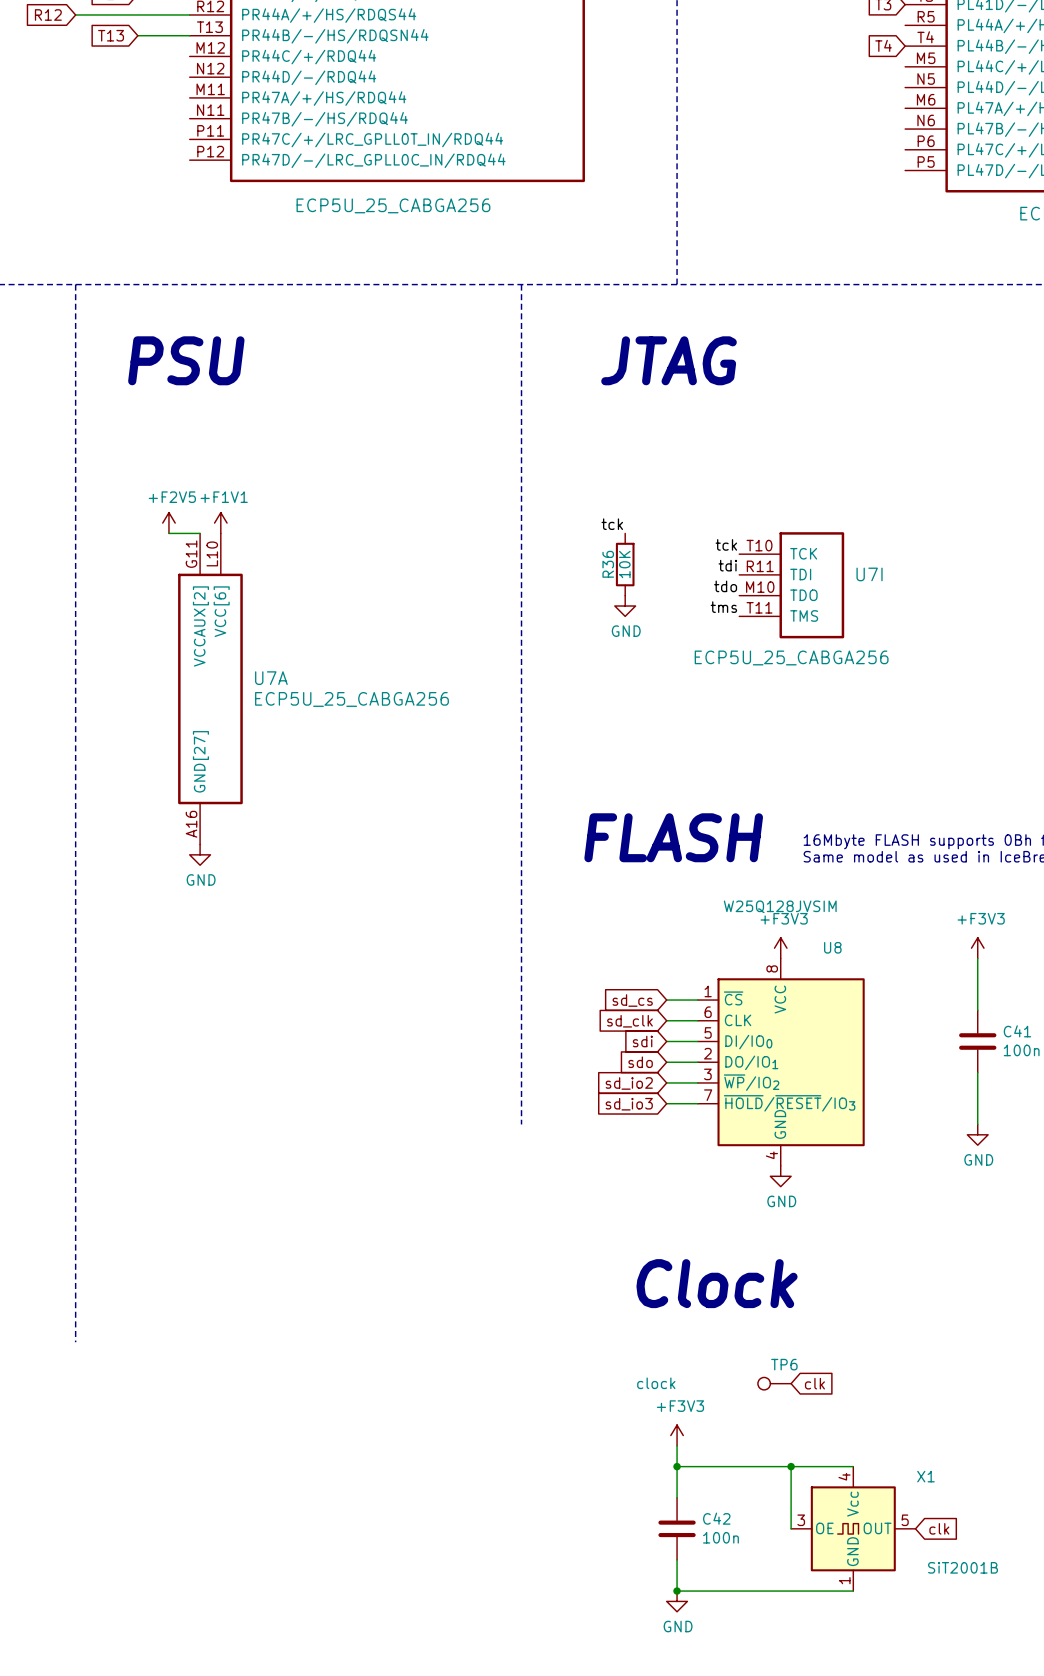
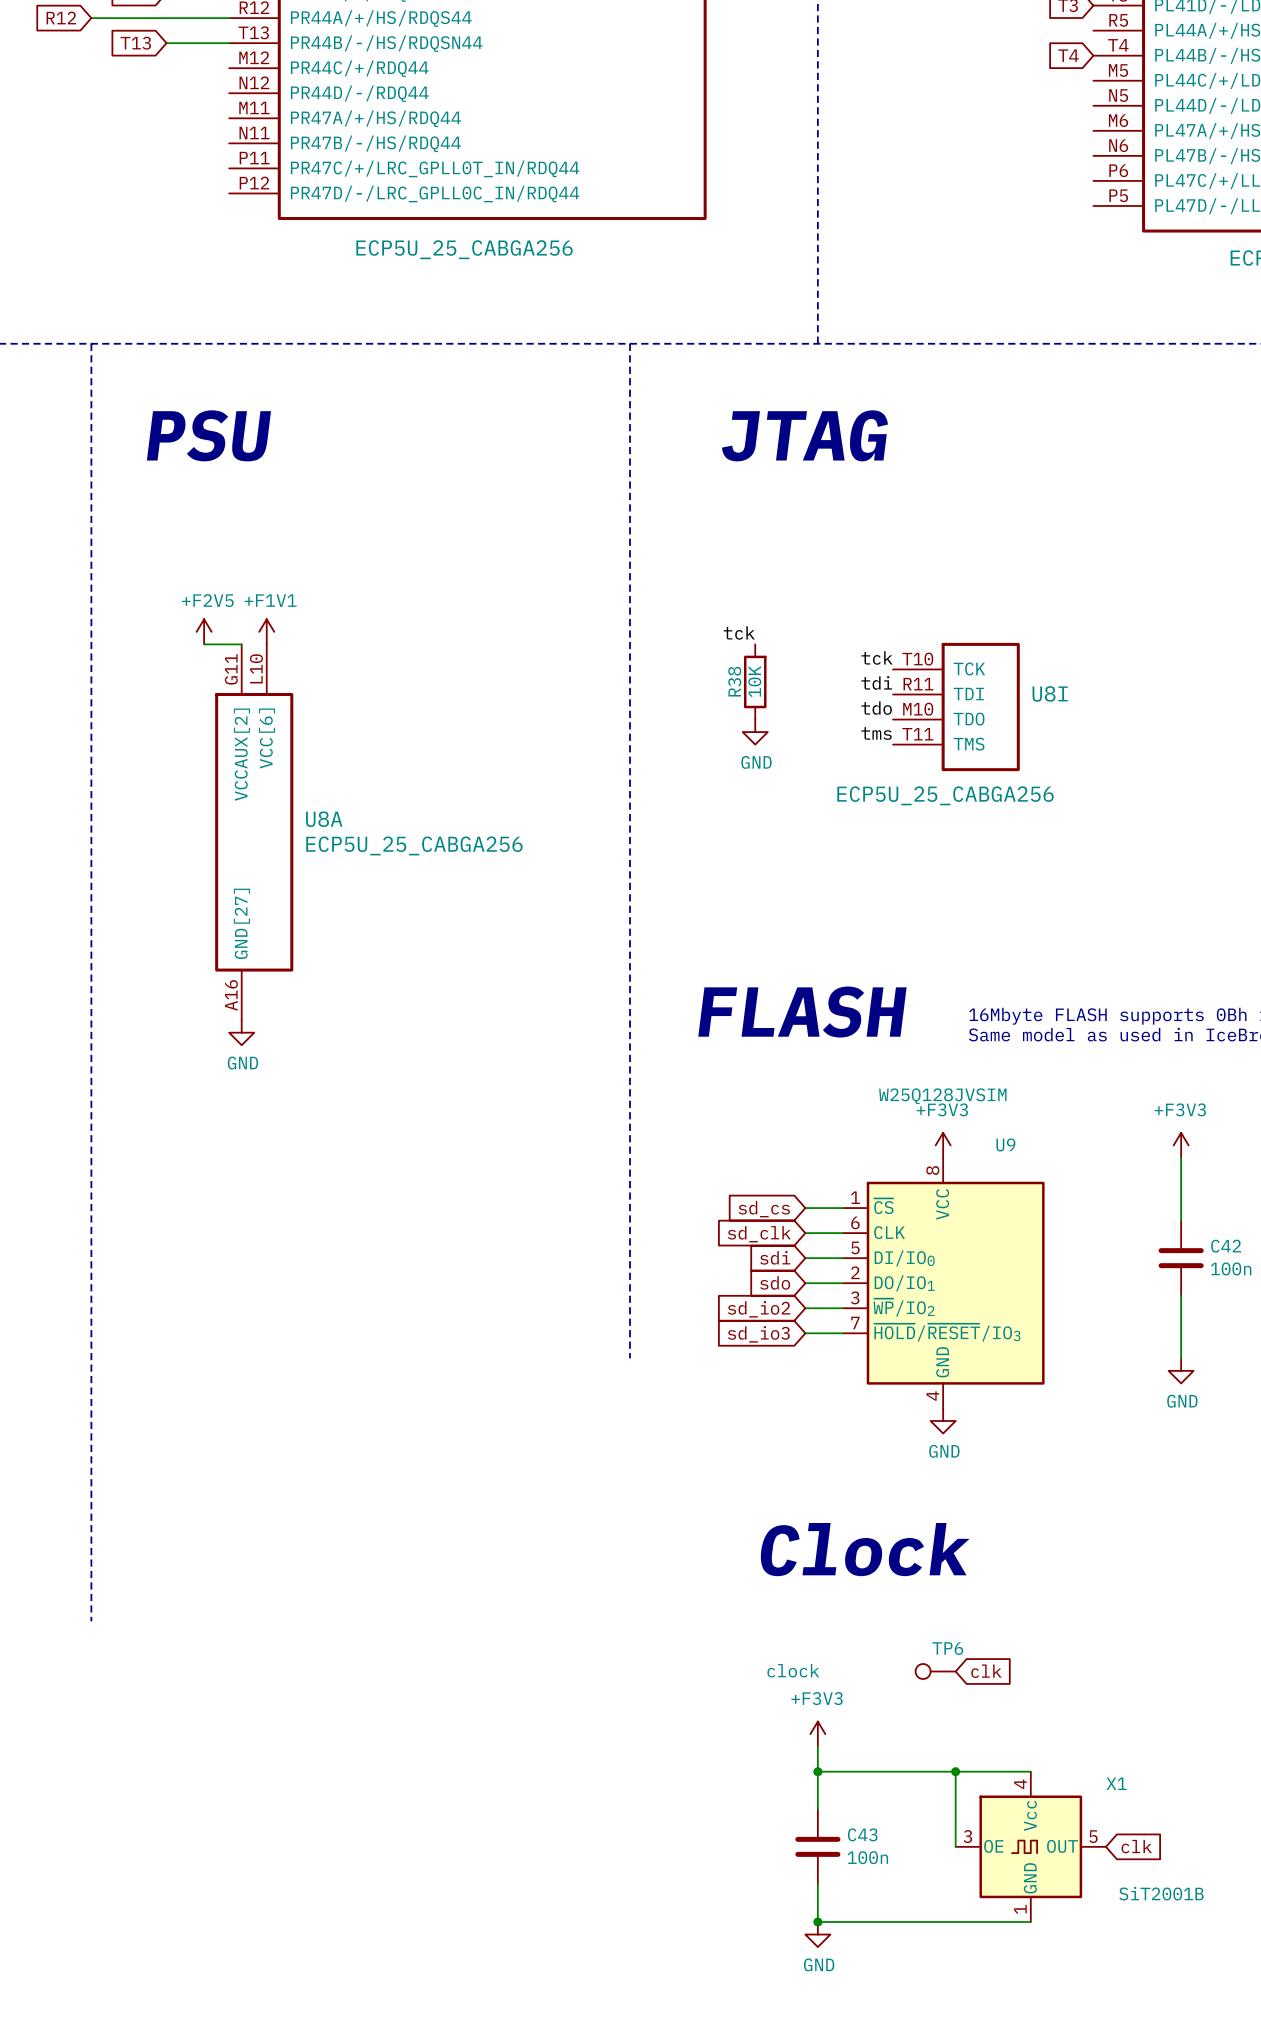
R36 name: R36 (608, 564) -> R38 (734, 681)
U7I name: U7I (869, 574) -> U8I (1050, 693)
U7A name: U7A (271, 678) -> U8A (324, 819)
U8 name: U8 (832, 947) -> U9 (1005, 1144)
C41 name: C41 (1017, 1031) -> C42 (1226, 1246)
C42 name: C42 (716, 1518) -> C43 (862, 1834)

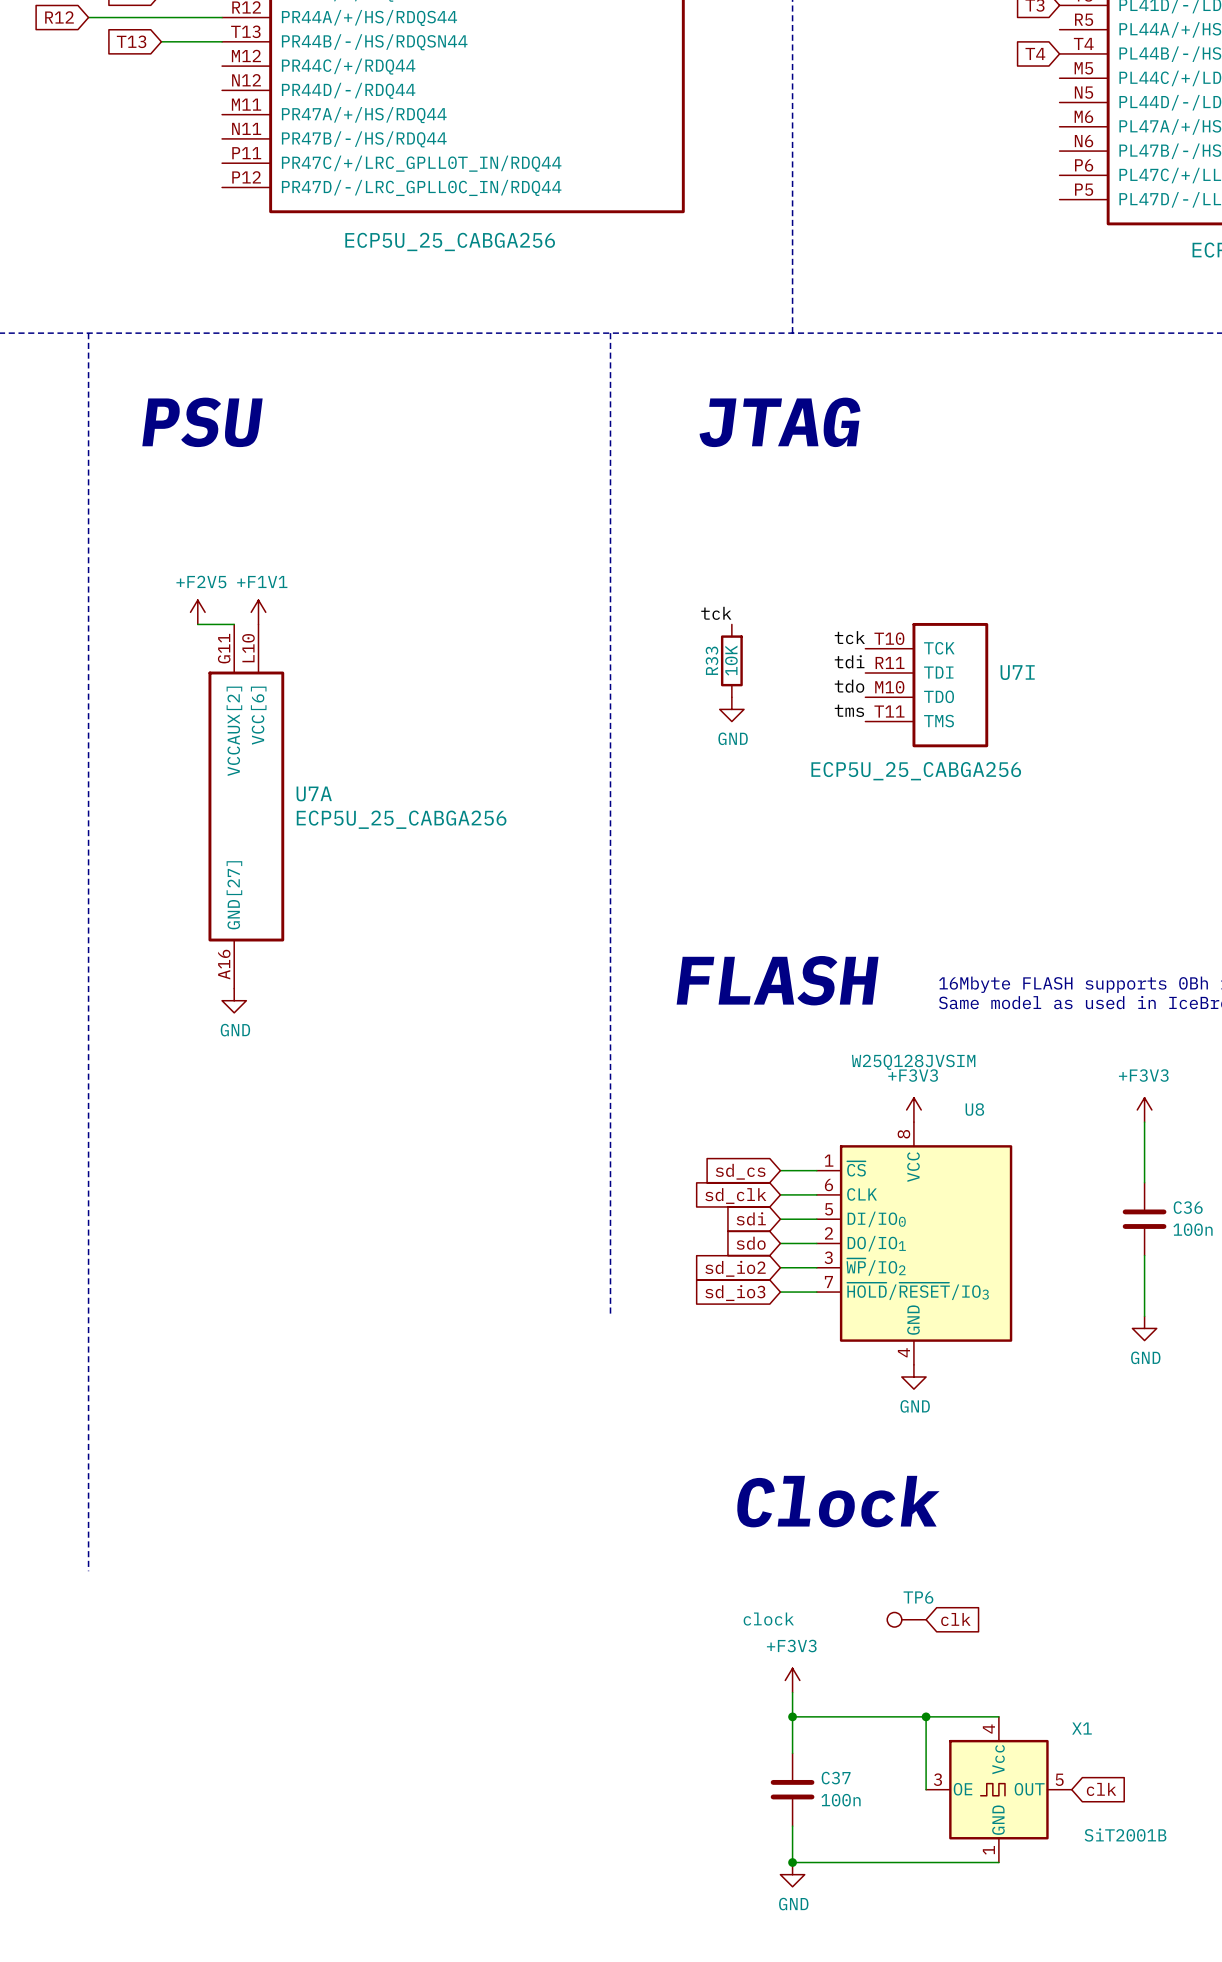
R38 name: R38 (734, 681) -> R33 (712, 660)
U8I name: U8I (1050, 693) -> U7I (1017, 672)
U8A name: U8A (324, 819) -> U7A (314, 793)
U9 name: U9 (1005, 1144) -> U8 (974, 1109)
C42 name: C42 (1226, 1246) -> C36 (1188, 1207)
C43 name: C43 (862, 1834) -> C37 (836, 1778)

